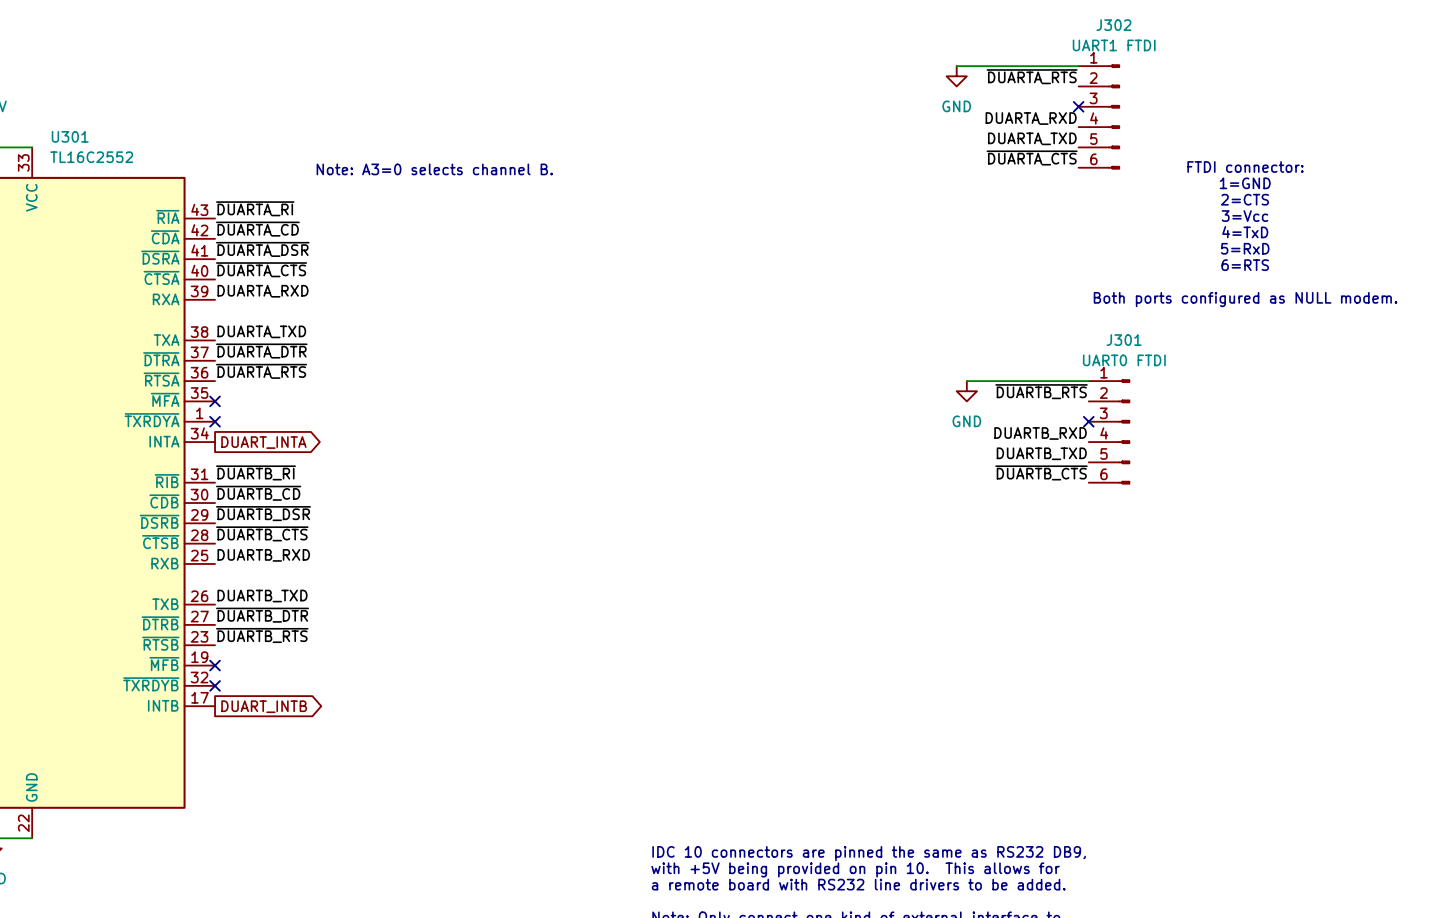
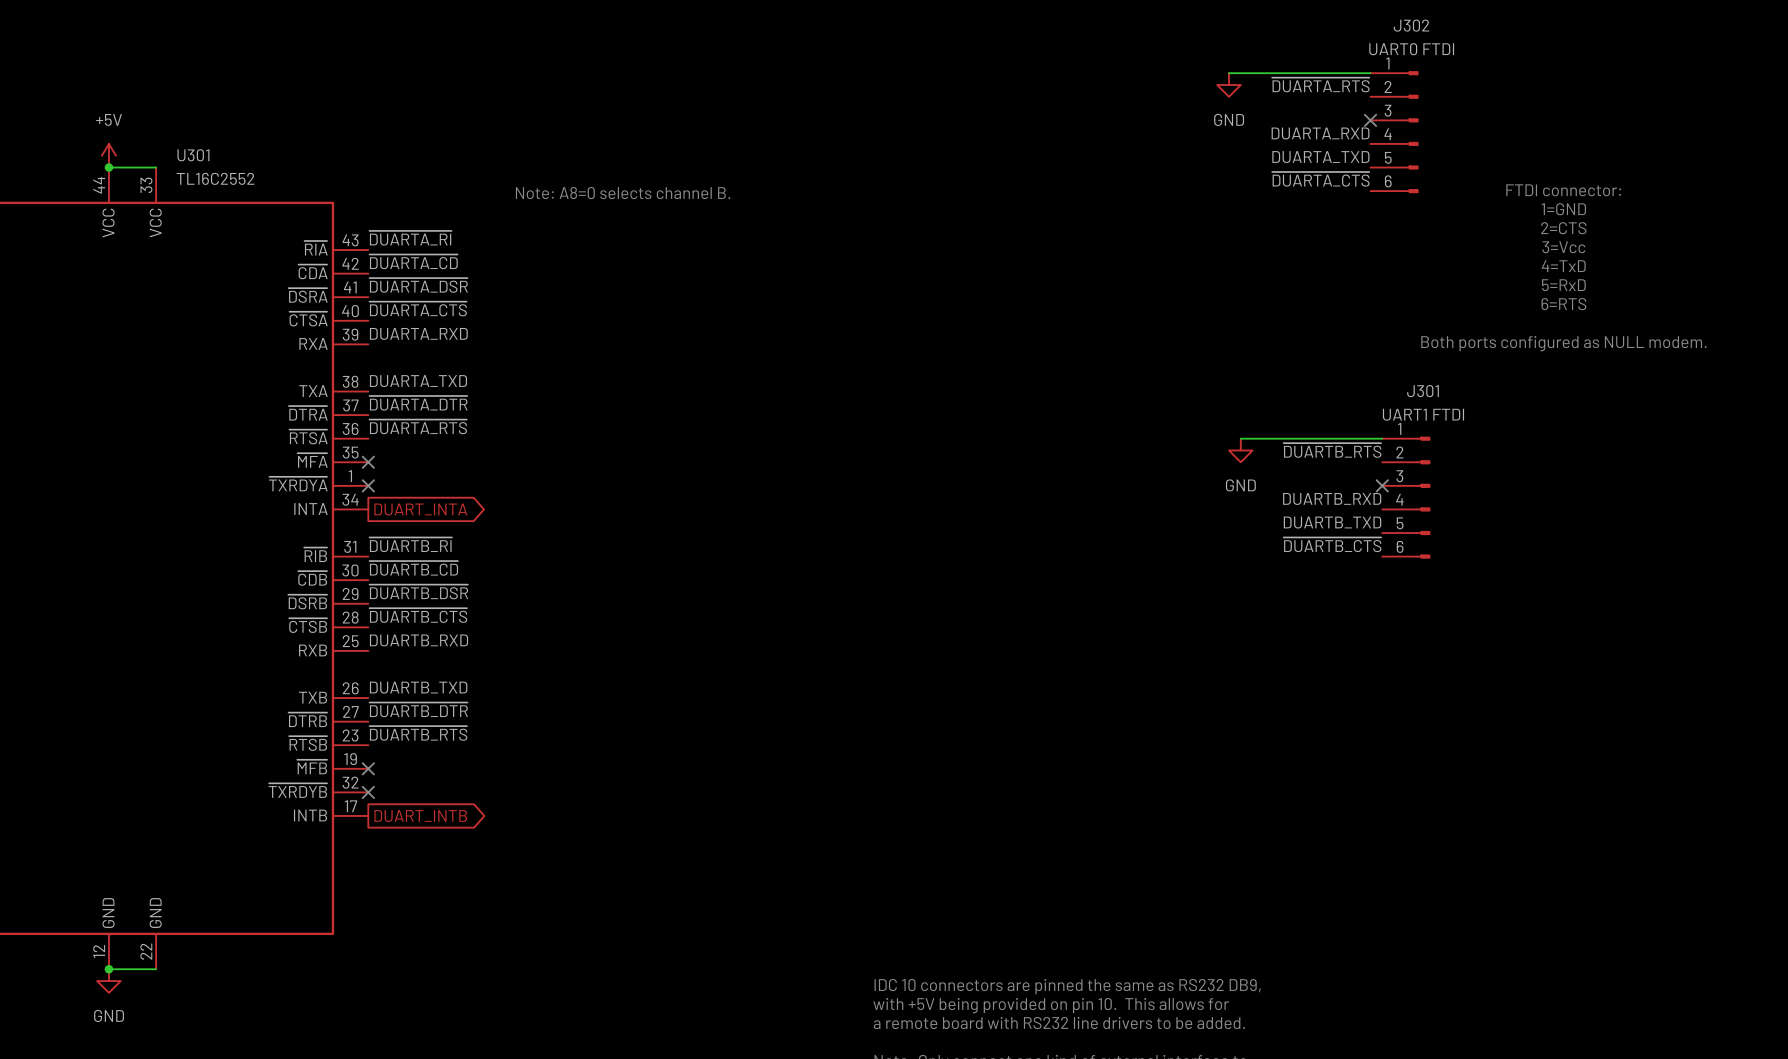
J302 value: UART1 FTDI (1114, 45) -> UART0 FTDI (1411, 49)
text: Note: A3=0 selects channel B. (434, 169) -> Note: A8=0 selects channel B. (623, 193)
J301 value: UART0 FTDI (1124, 360) -> UART1 FTDI (1423, 414)

